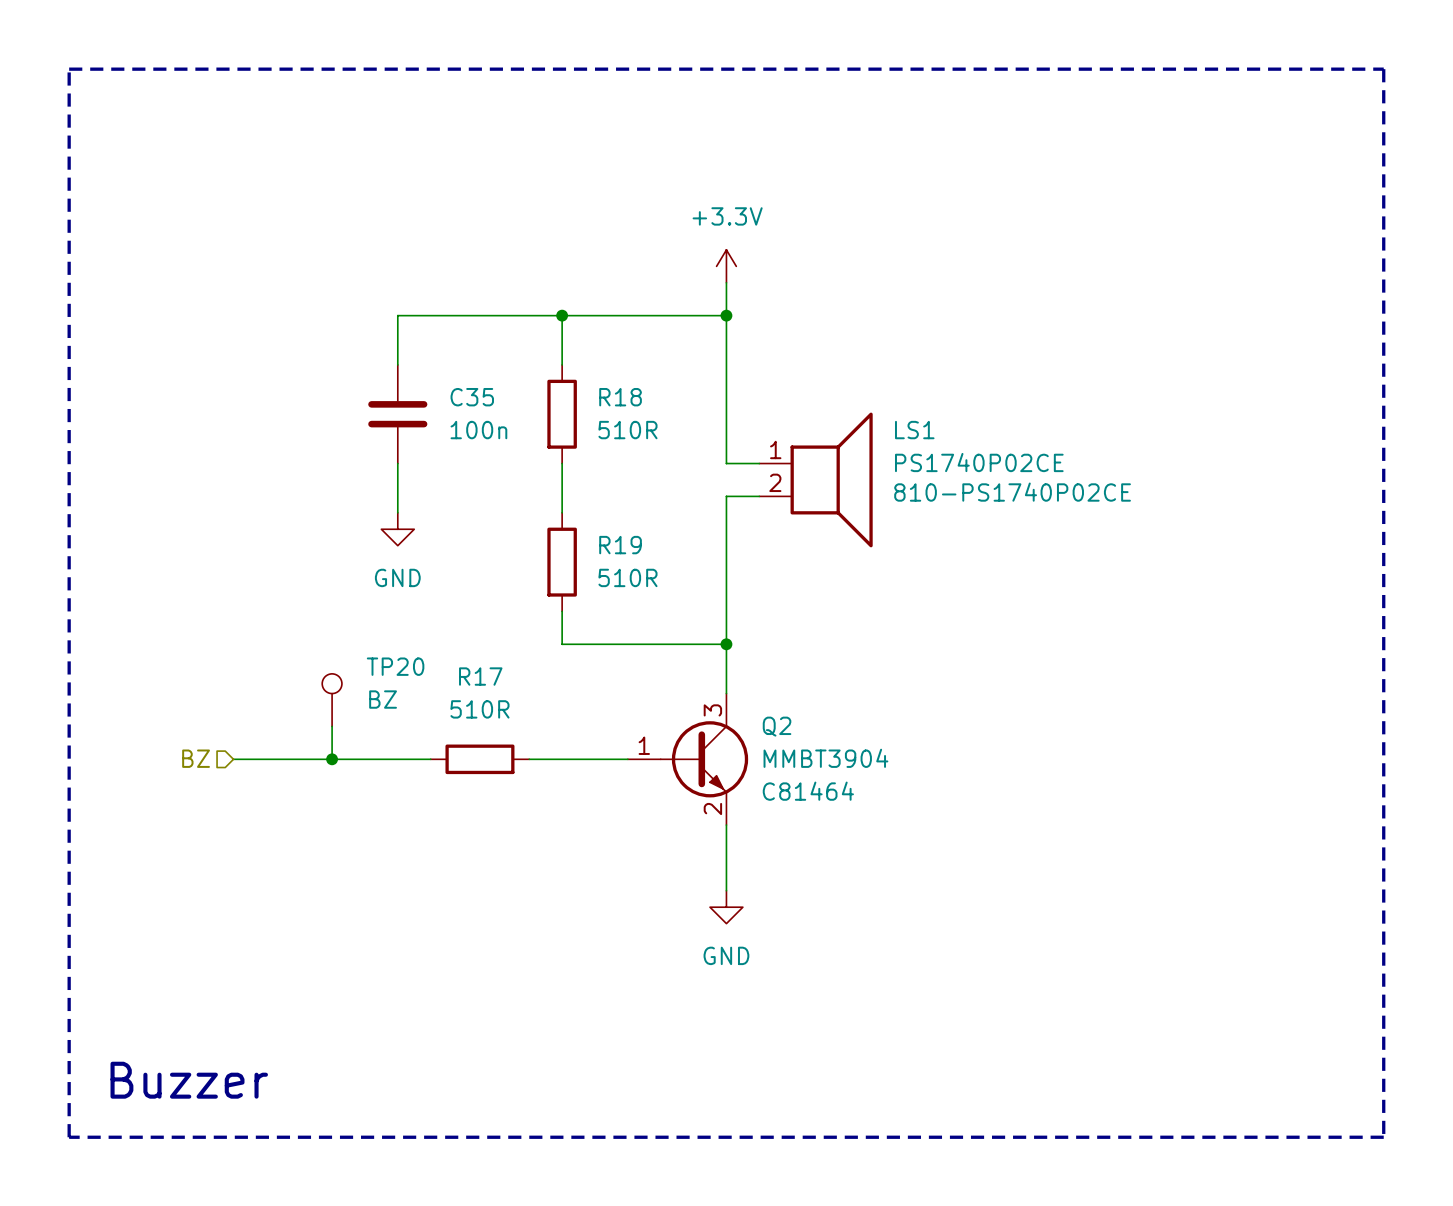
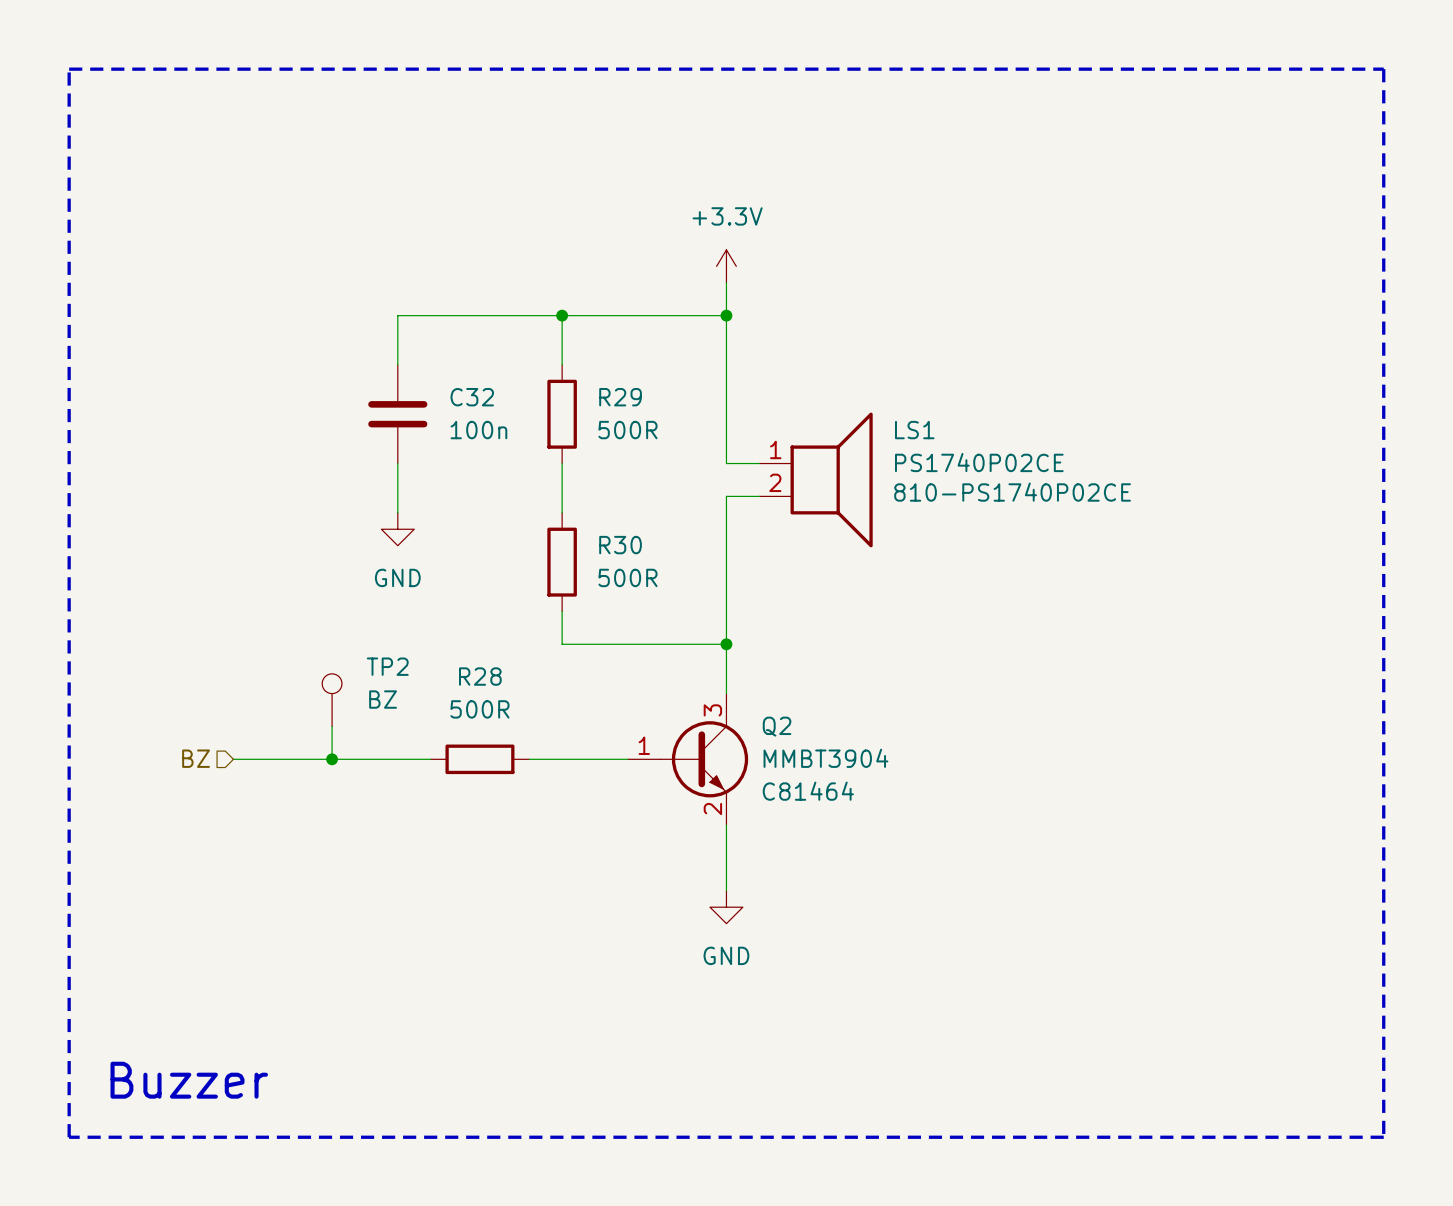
C35 name: C35 (472, 397) -> C32 (472, 397)
R18 name: R18 (620, 397) -> R29 (620, 397)
R18 value: 510R (627, 430) -> 500R (627, 430)
R19 name: R19 (620, 545) -> R30 (620, 545)
R19 value: 510R (627, 577) -> 500R (627, 577)
TP20 name: TP20 (395, 666) -> TP2 (387, 666)
R17 name: R17 (480, 676) -> R28 (480, 676)
R17 value: 510R (479, 709) -> 500R (479, 709)

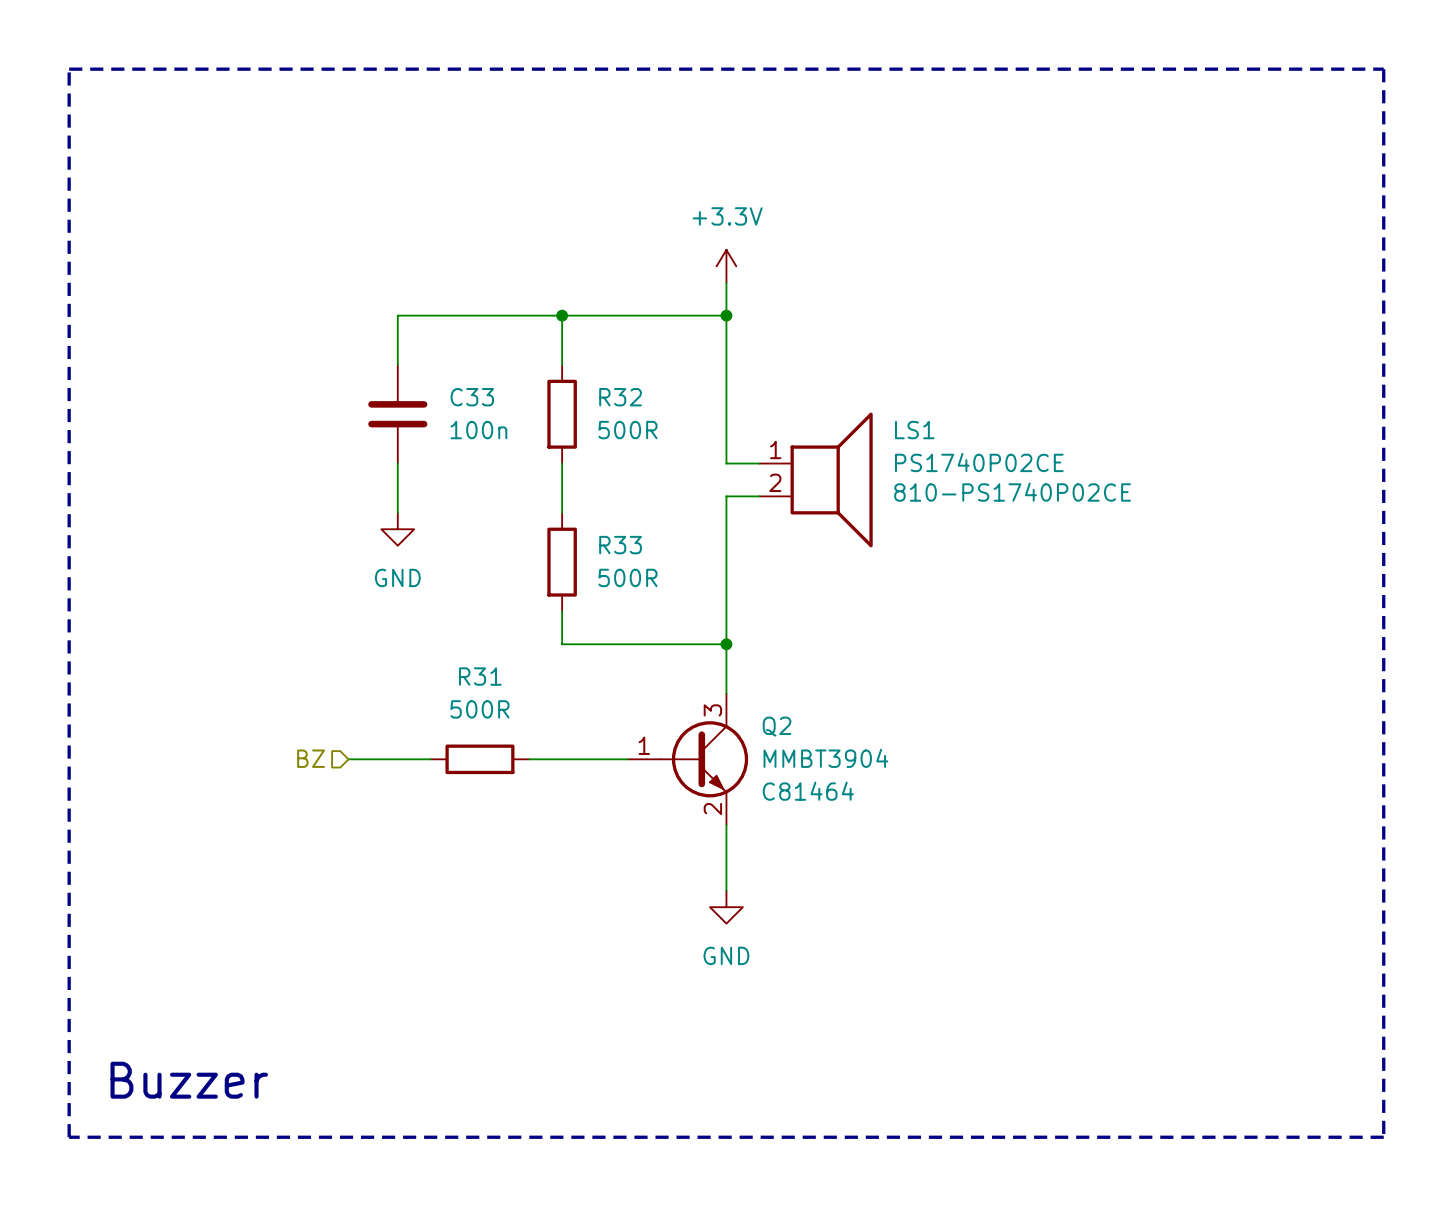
C32 name: C32 (472, 397) -> C33 (472, 397)
R29 name: R29 (620, 397) -> R32 (620, 397)
R30 name: R30 (620, 545) -> R33 (620, 545)
R28 name: R28 (480, 676) -> R31 (480, 676)
TP2: BZ (332, 700) -> none
wire: (332, 726) (332, 759) -> none
hierarchical label position: BZ (196, 758) -> BZ (311, 758)
wire: (233, 759) (348, 759) -> none
junction: (332, 759) -> none

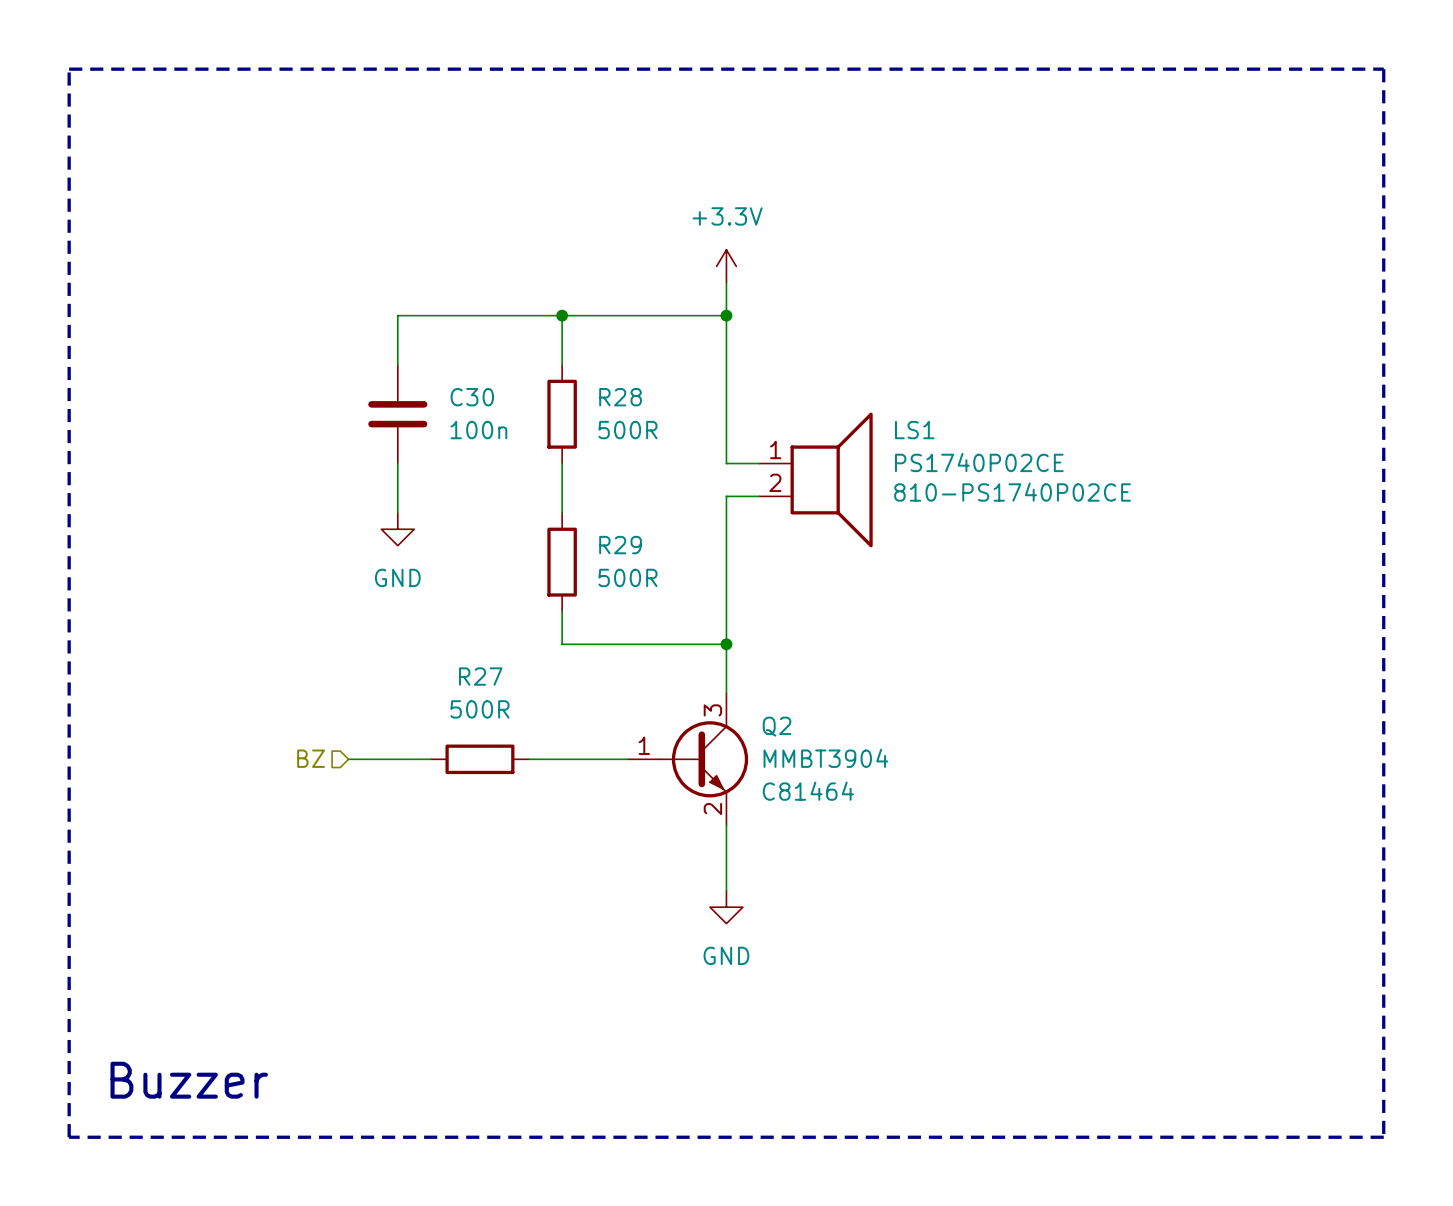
C33 name: C33 (472, 397) -> C30 (472, 397)
R32 name: R32 (620, 397) -> R28 (620, 397)
R33 name: R33 (620, 545) -> R29 (620, 545)
R31 name: R31 (480, 676) -> R27 (480, 676)

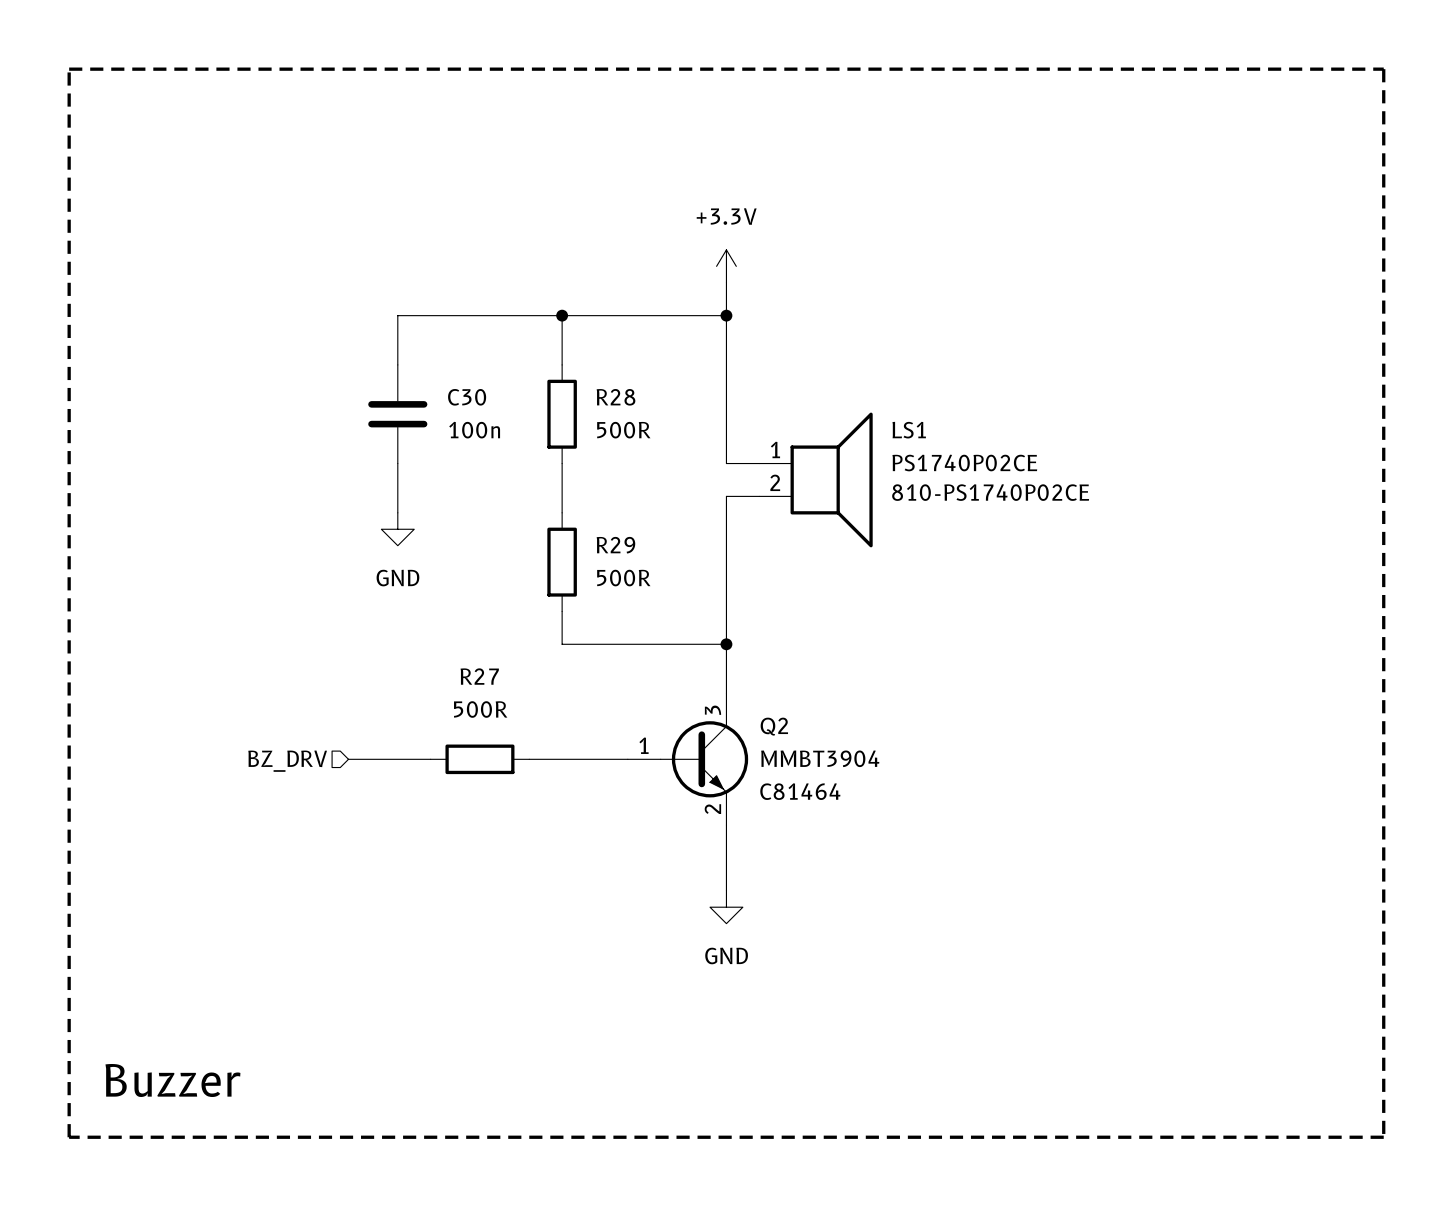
hierarchical label: BZ (311, 758) -> BZ_DRV (287, 761)

